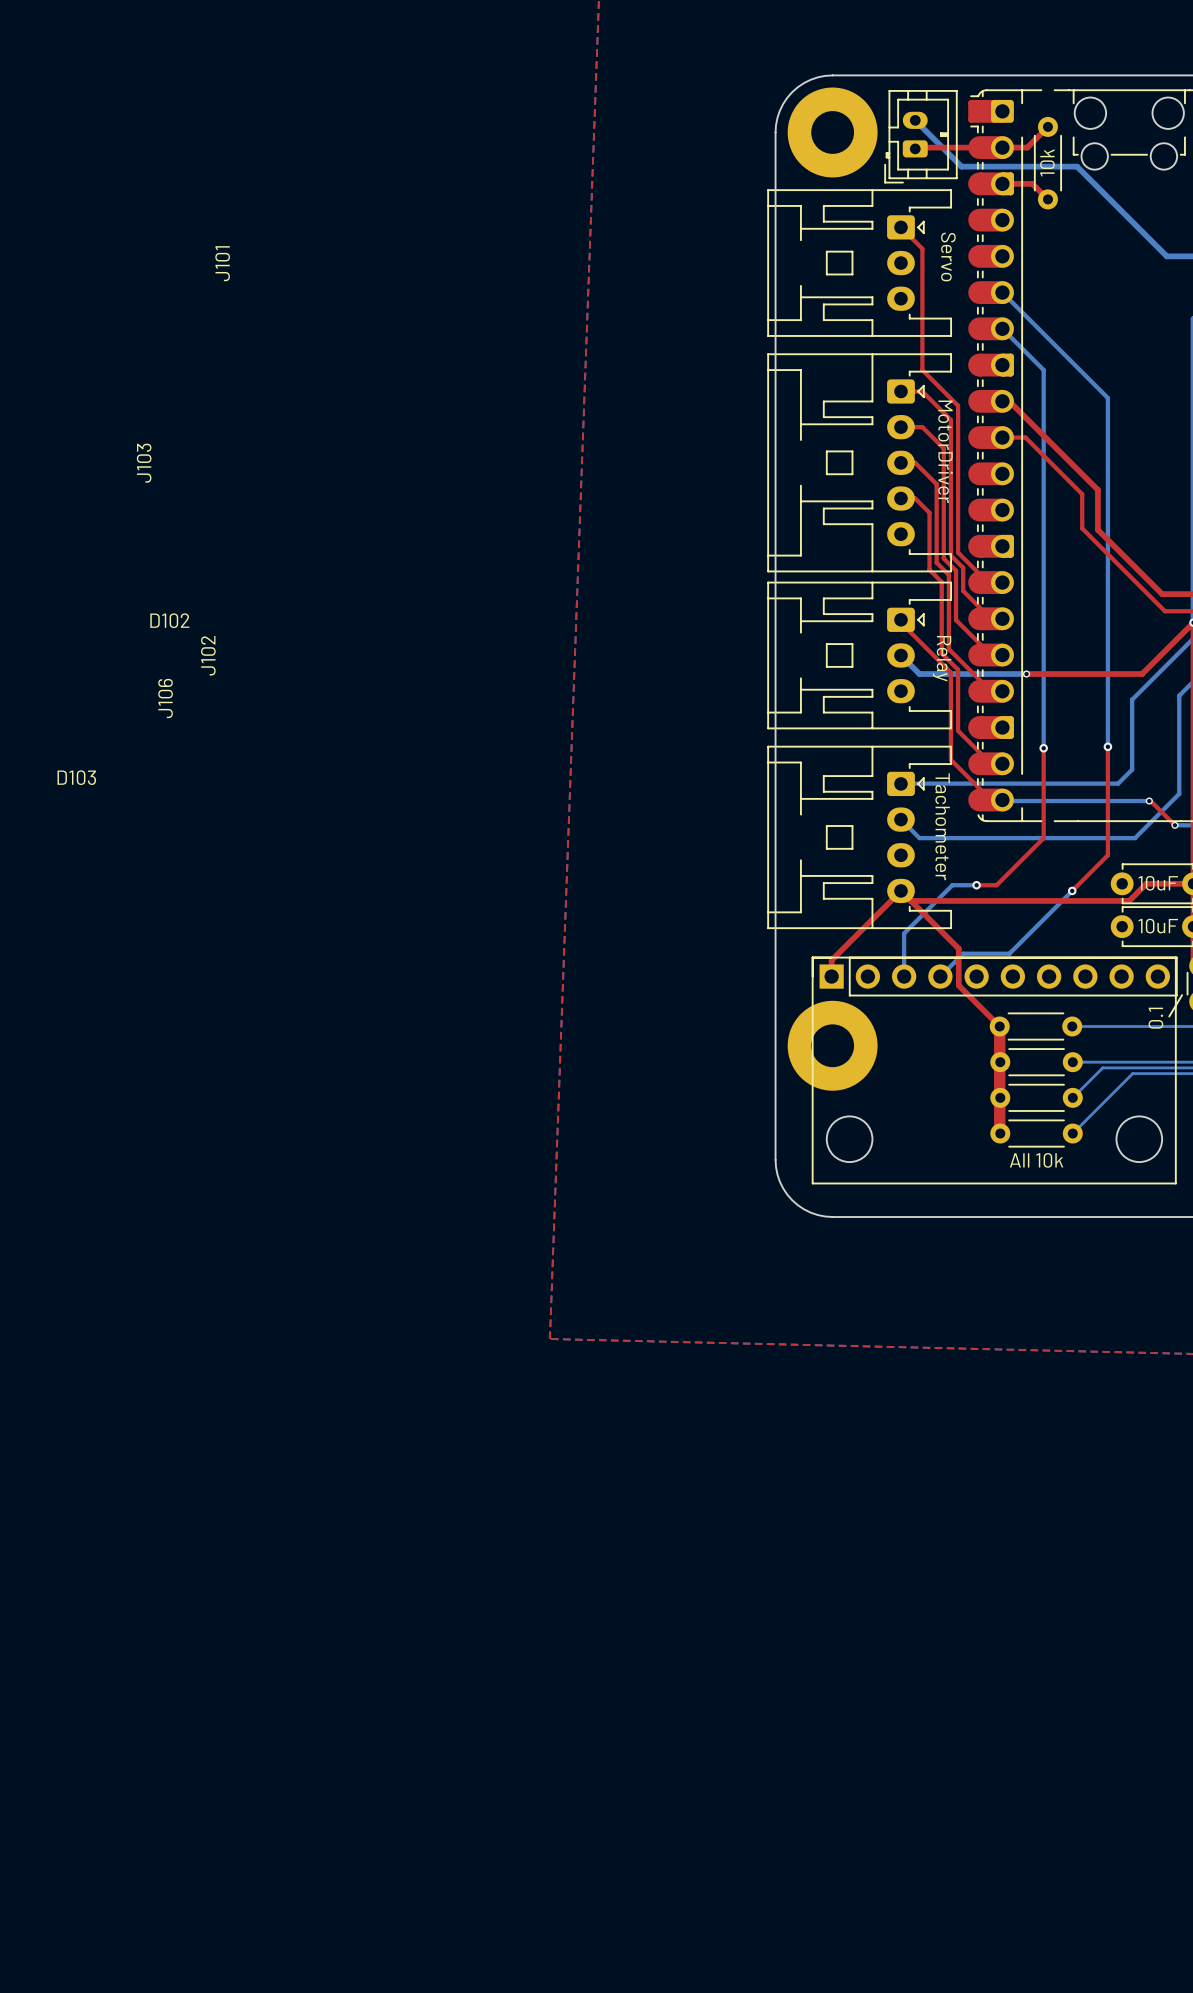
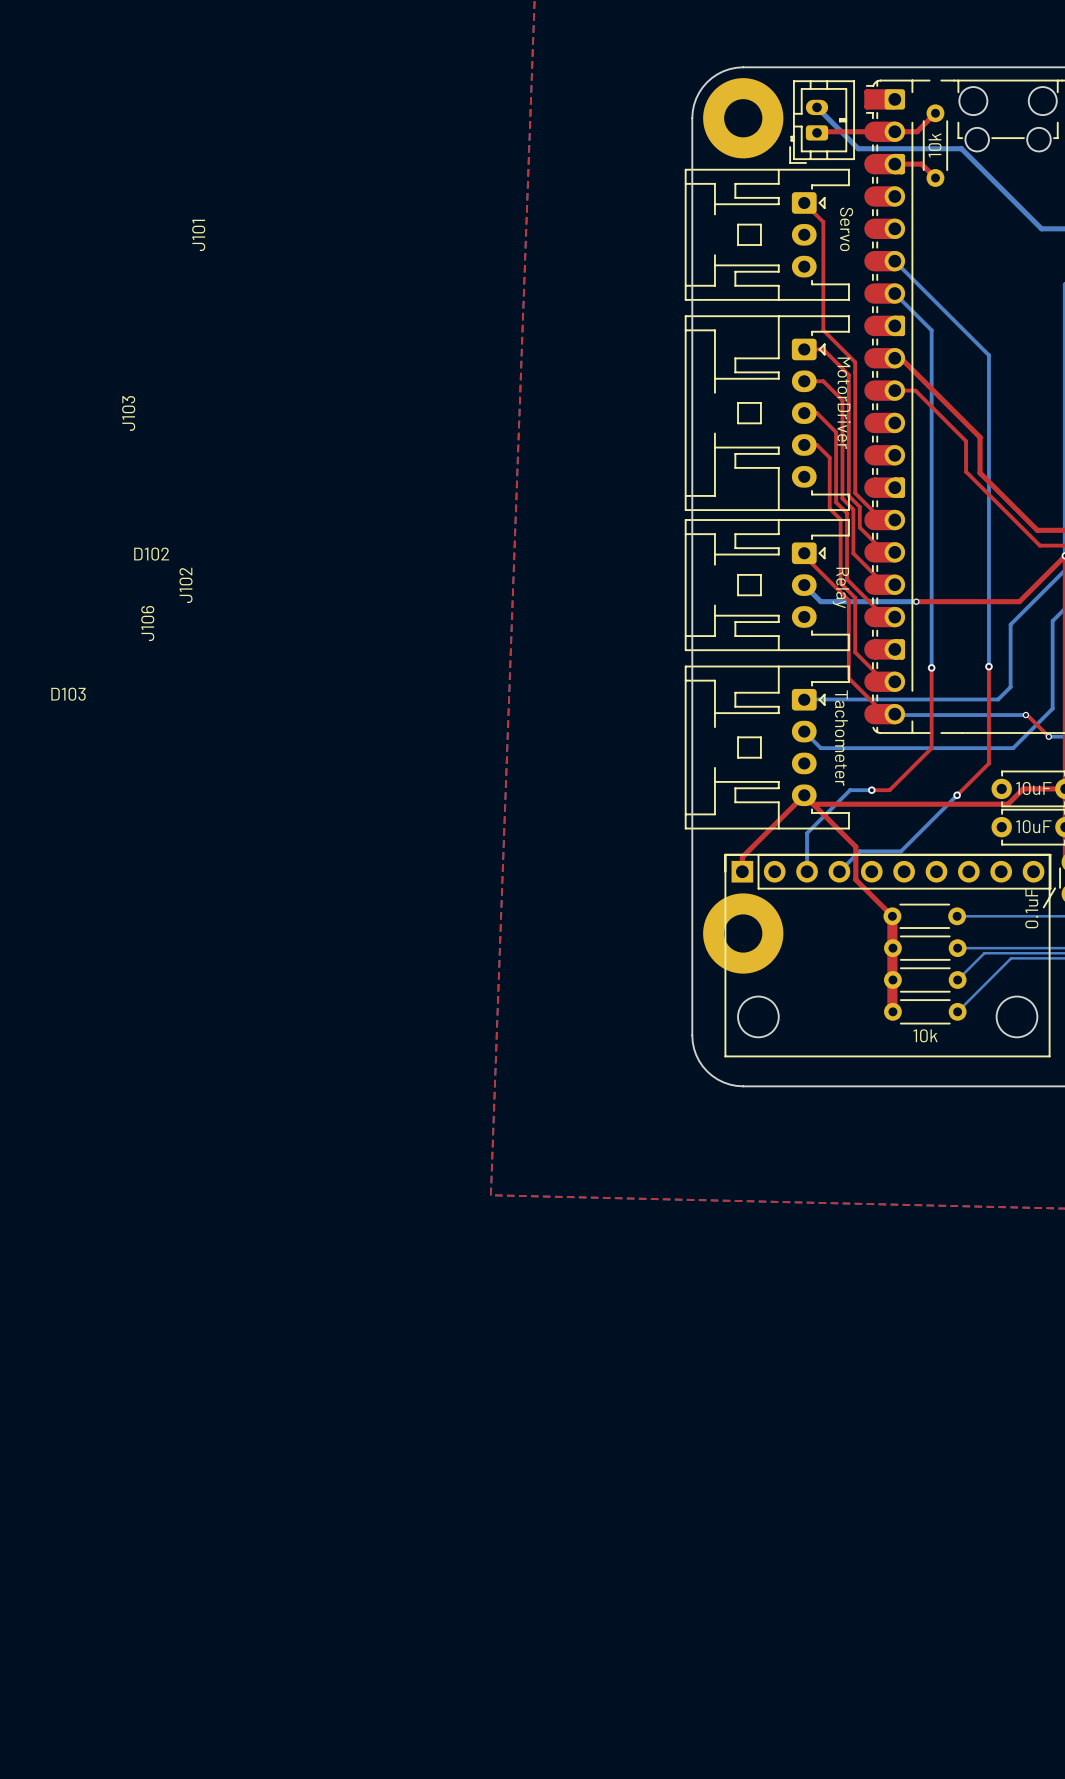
part value: 0.1 (1155, 1018) -> 0.1uF (1031, 908)
part value: All 10k (1036, 1160) -> 10k (925, 1035)

